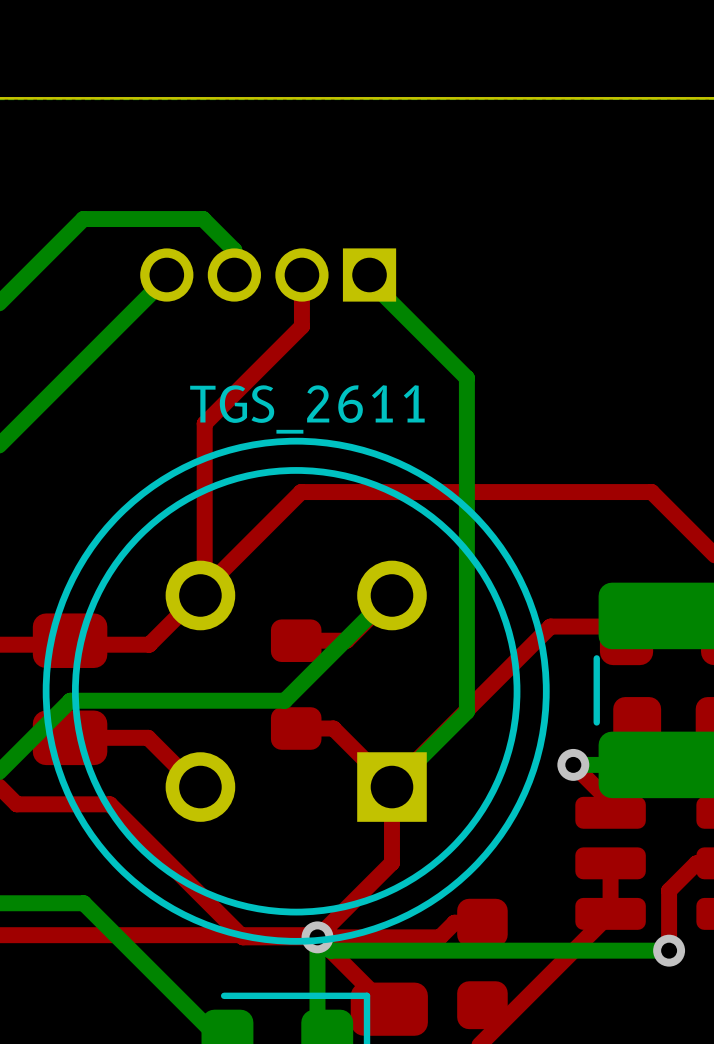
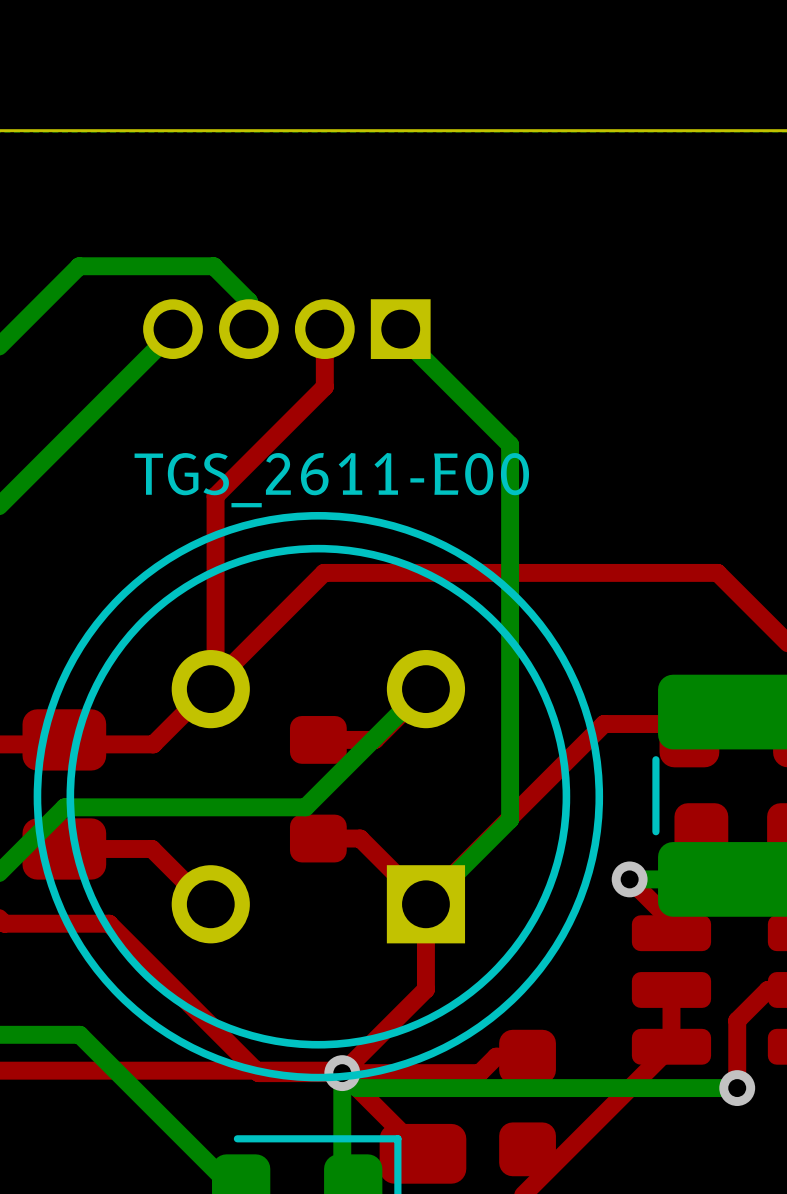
part value: TGS_2611 (307, 409) -> TGS_2611-E00 (331, 480)

